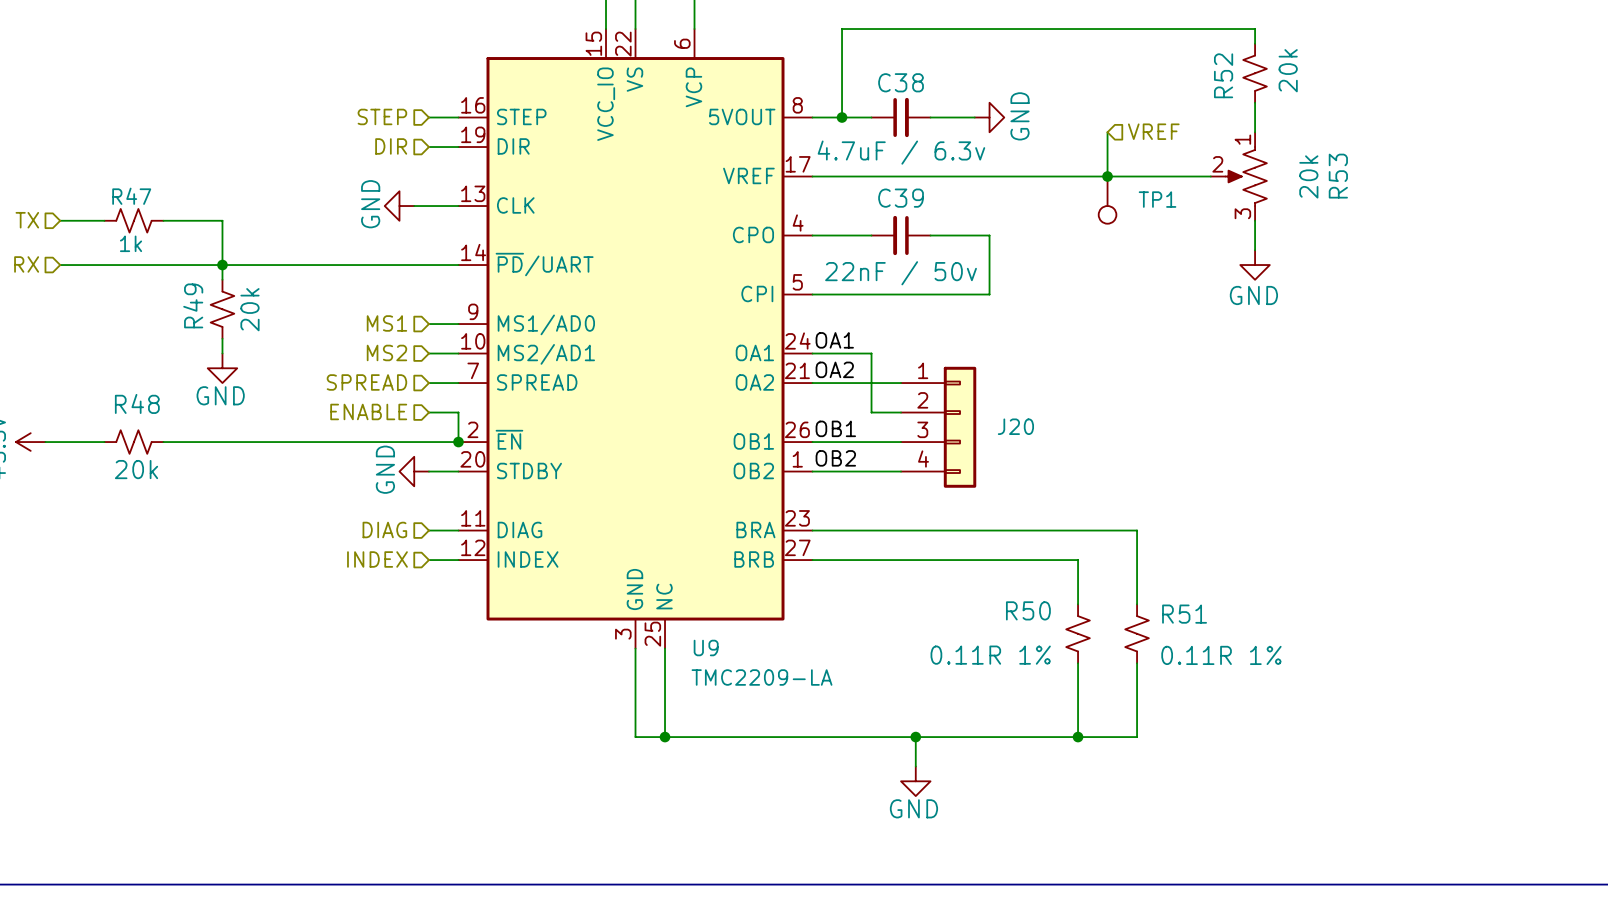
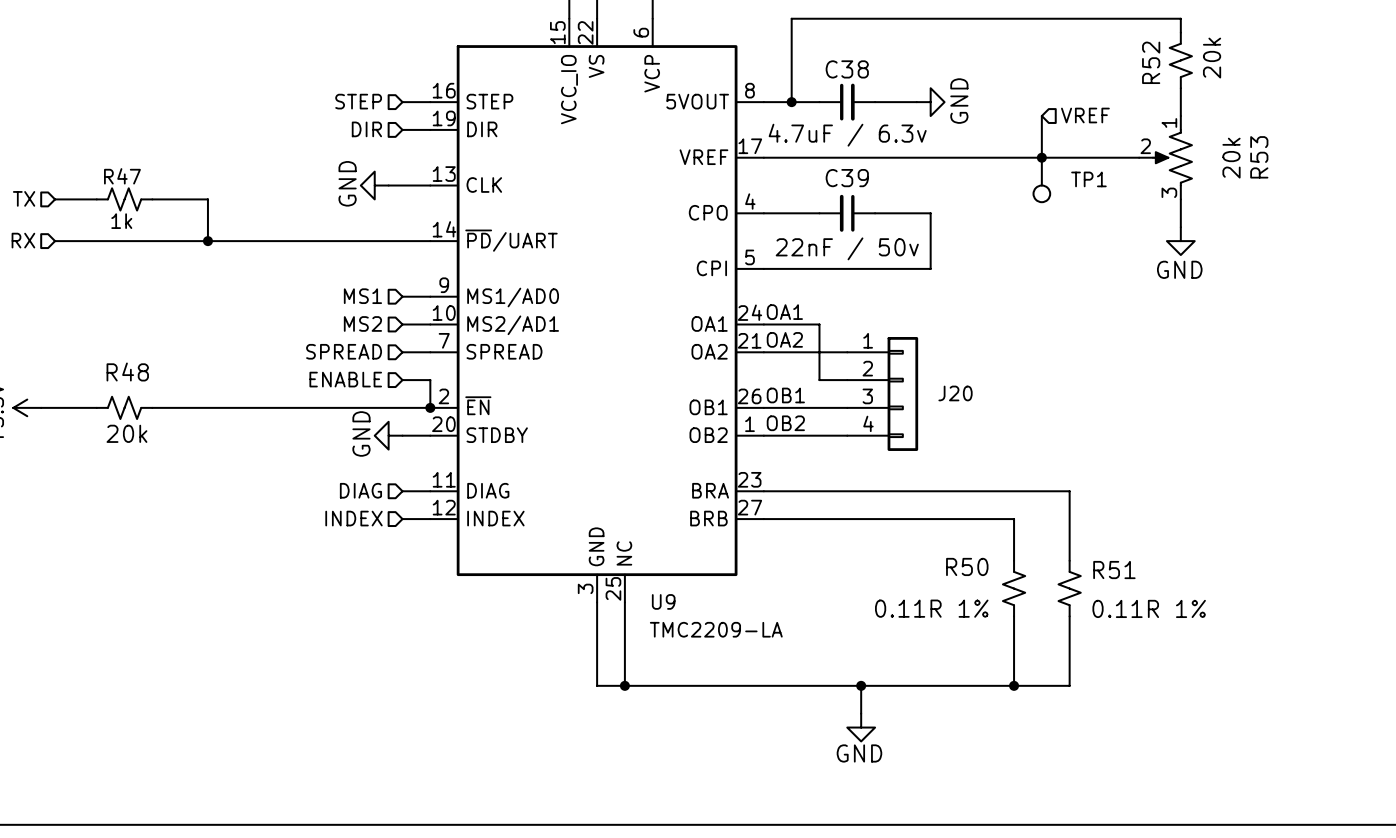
wire: (222, 265) (222, 279) -> none
R49: 20k (222, 309) -> none
wire: (222, 338) (222, 353) -> none
power symbol: GND (222, 368) -> none

